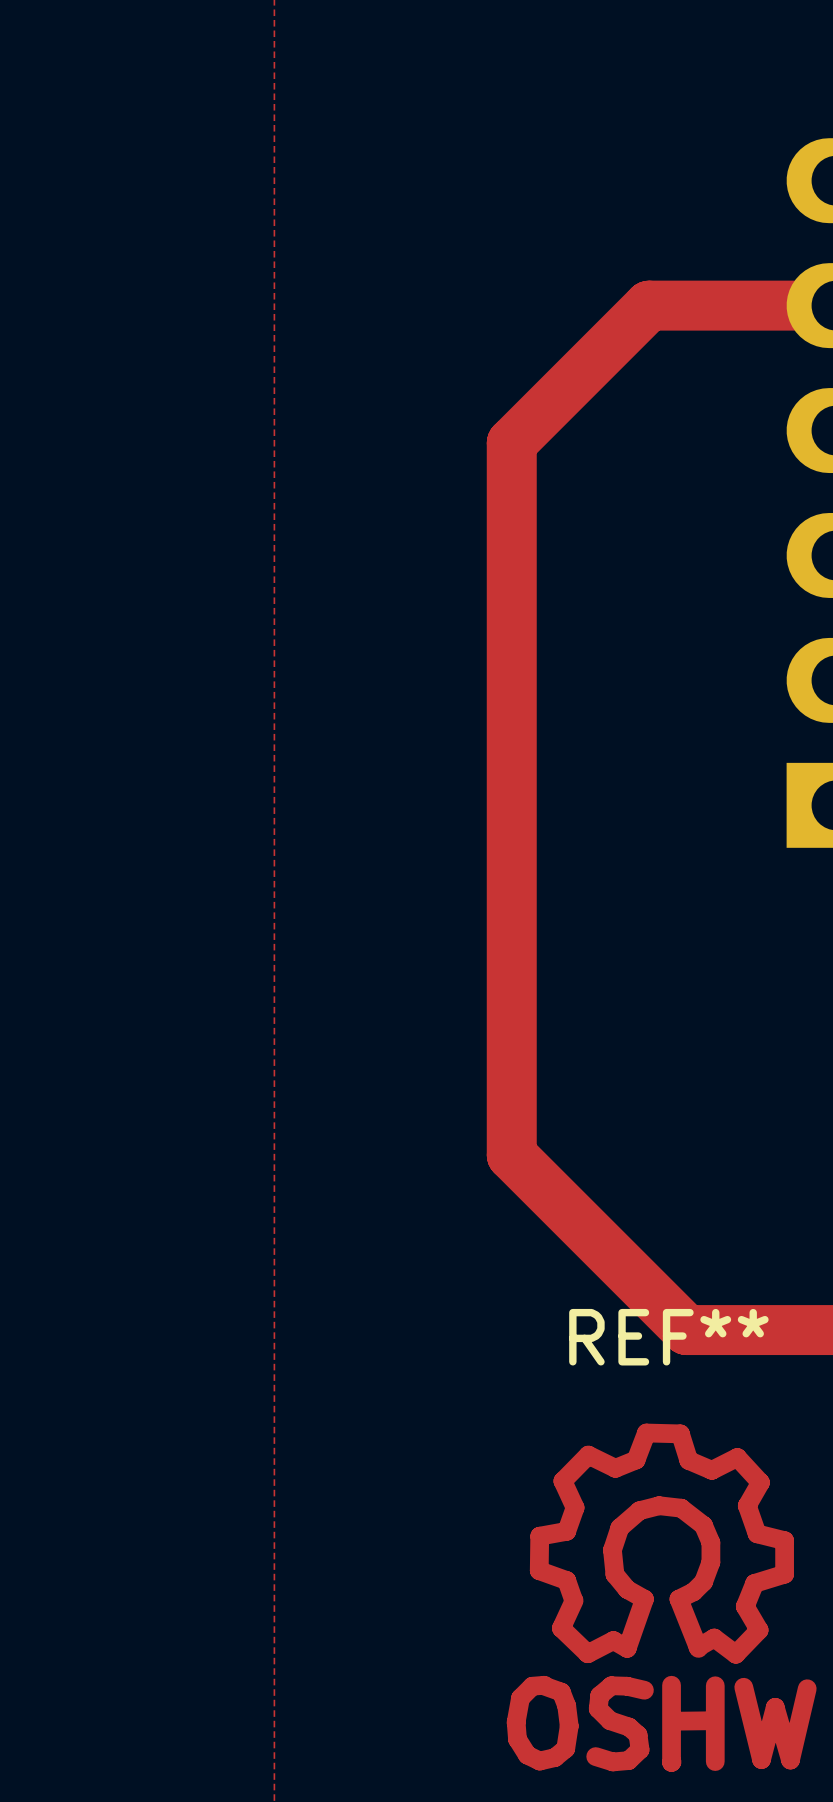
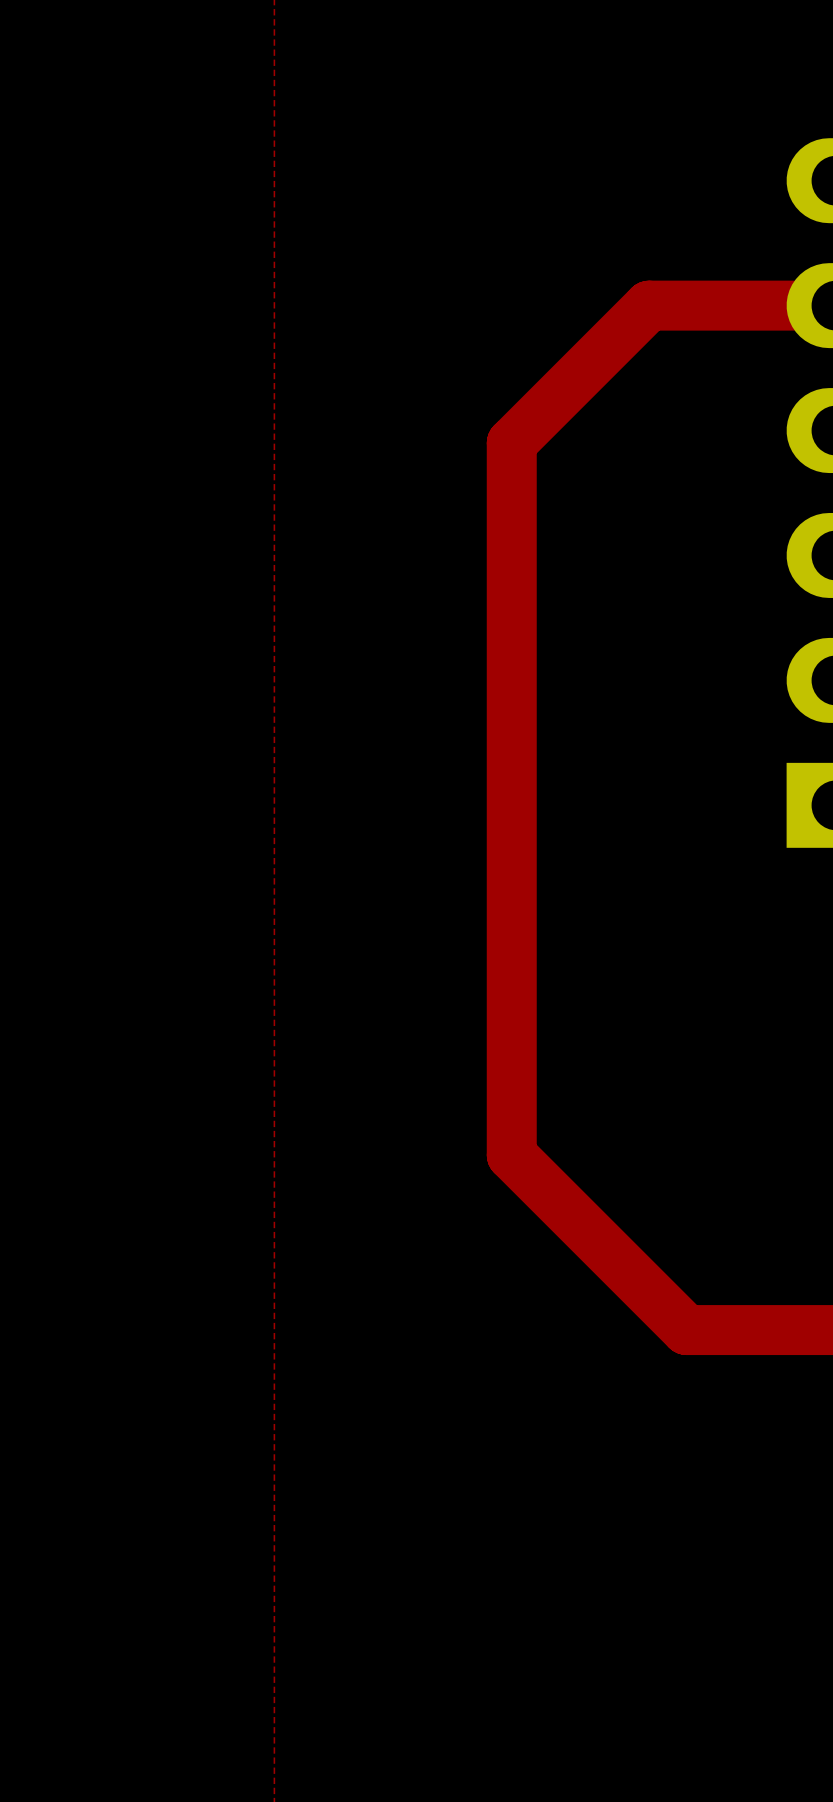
REF**: (661, 1597) -> none

